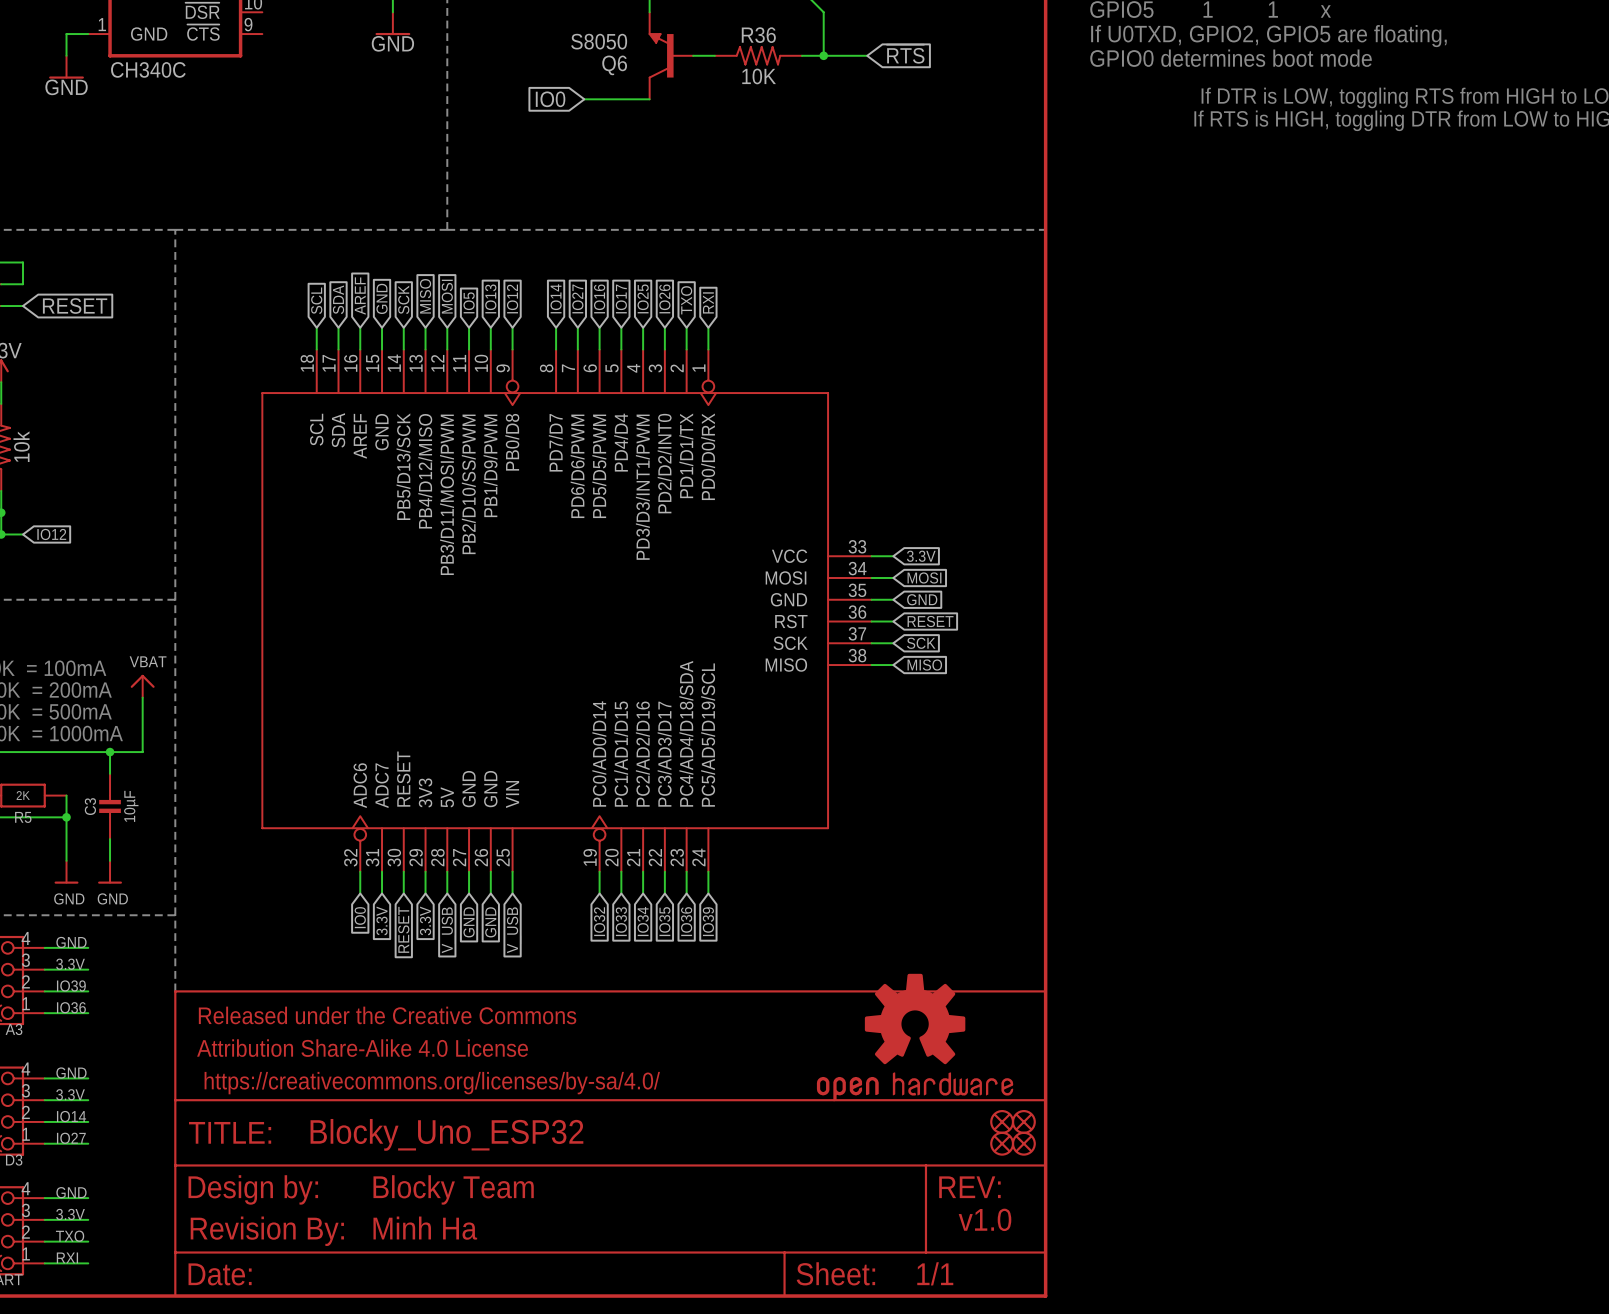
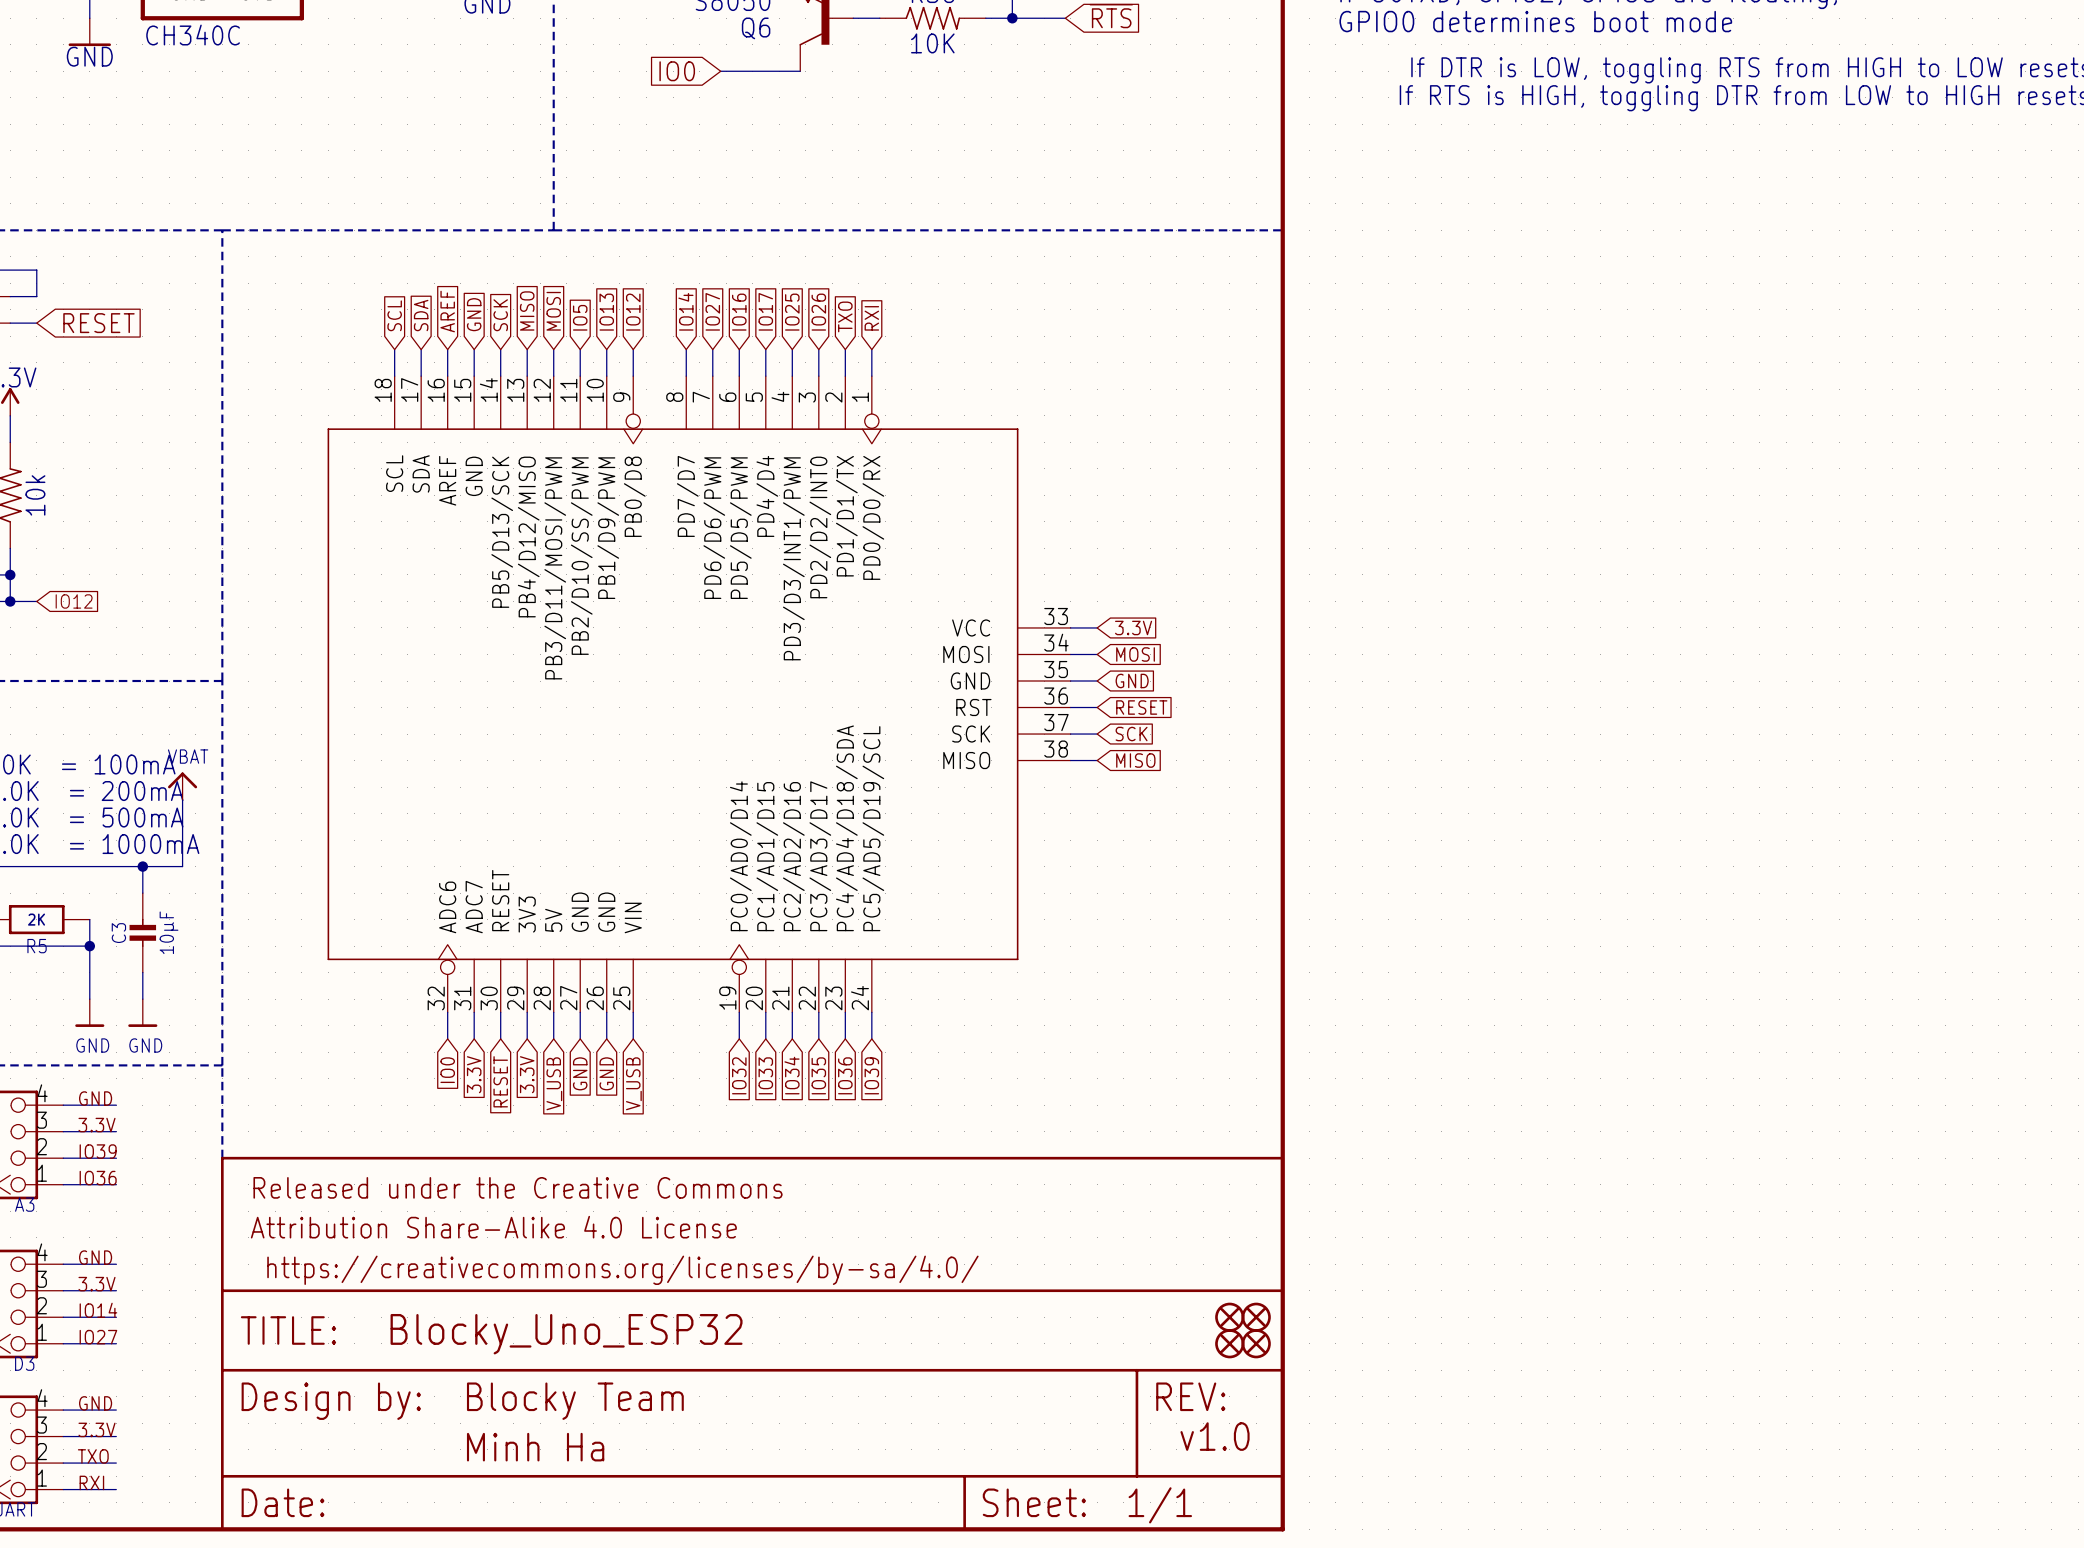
part: (915, 1037) -> none
part: (267, 1231) -> none

